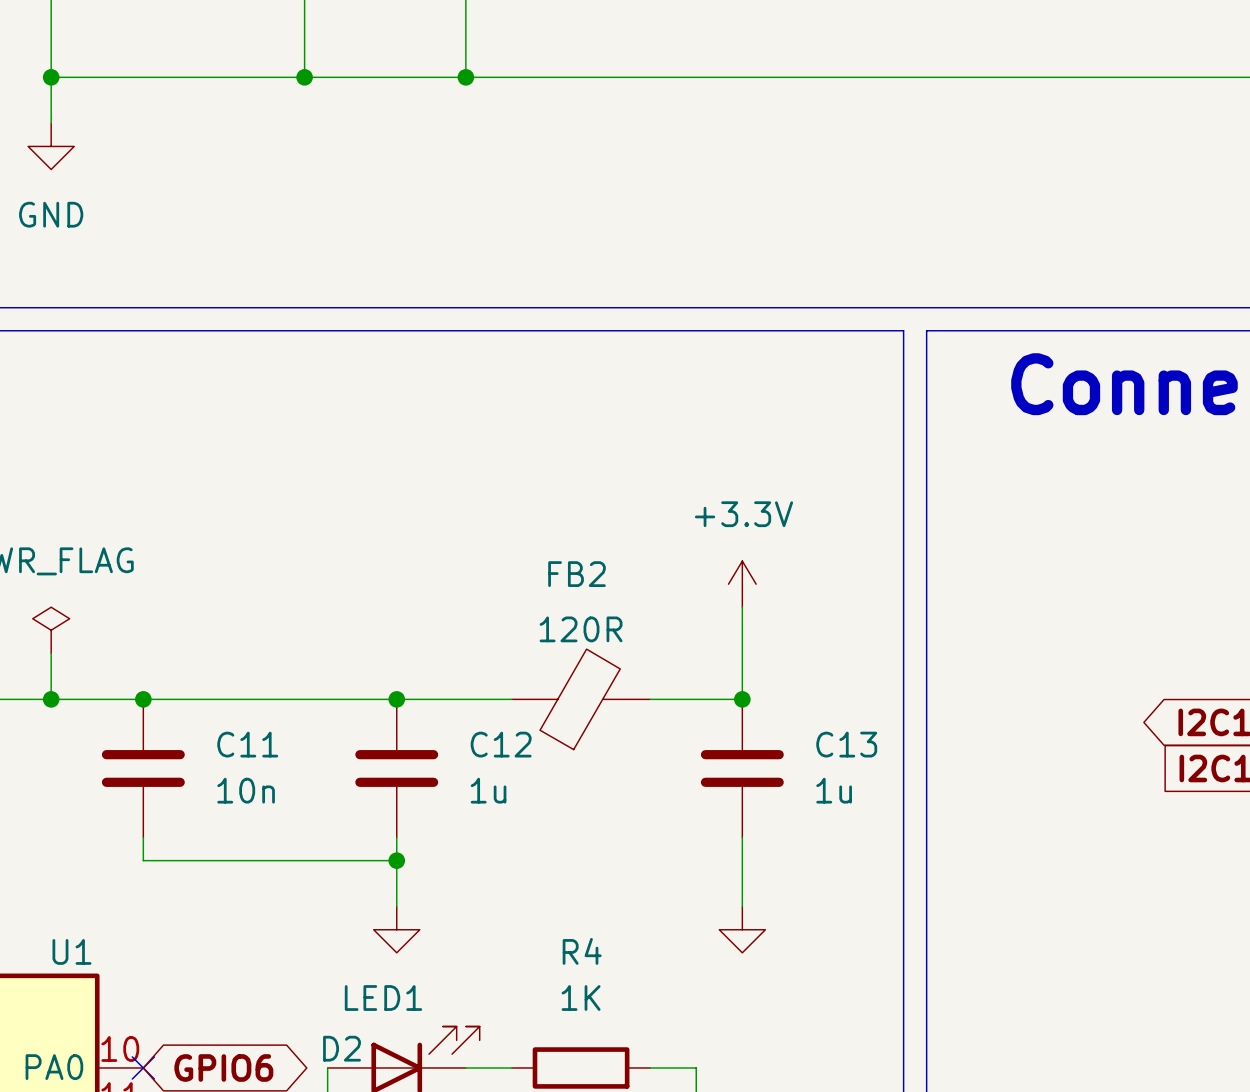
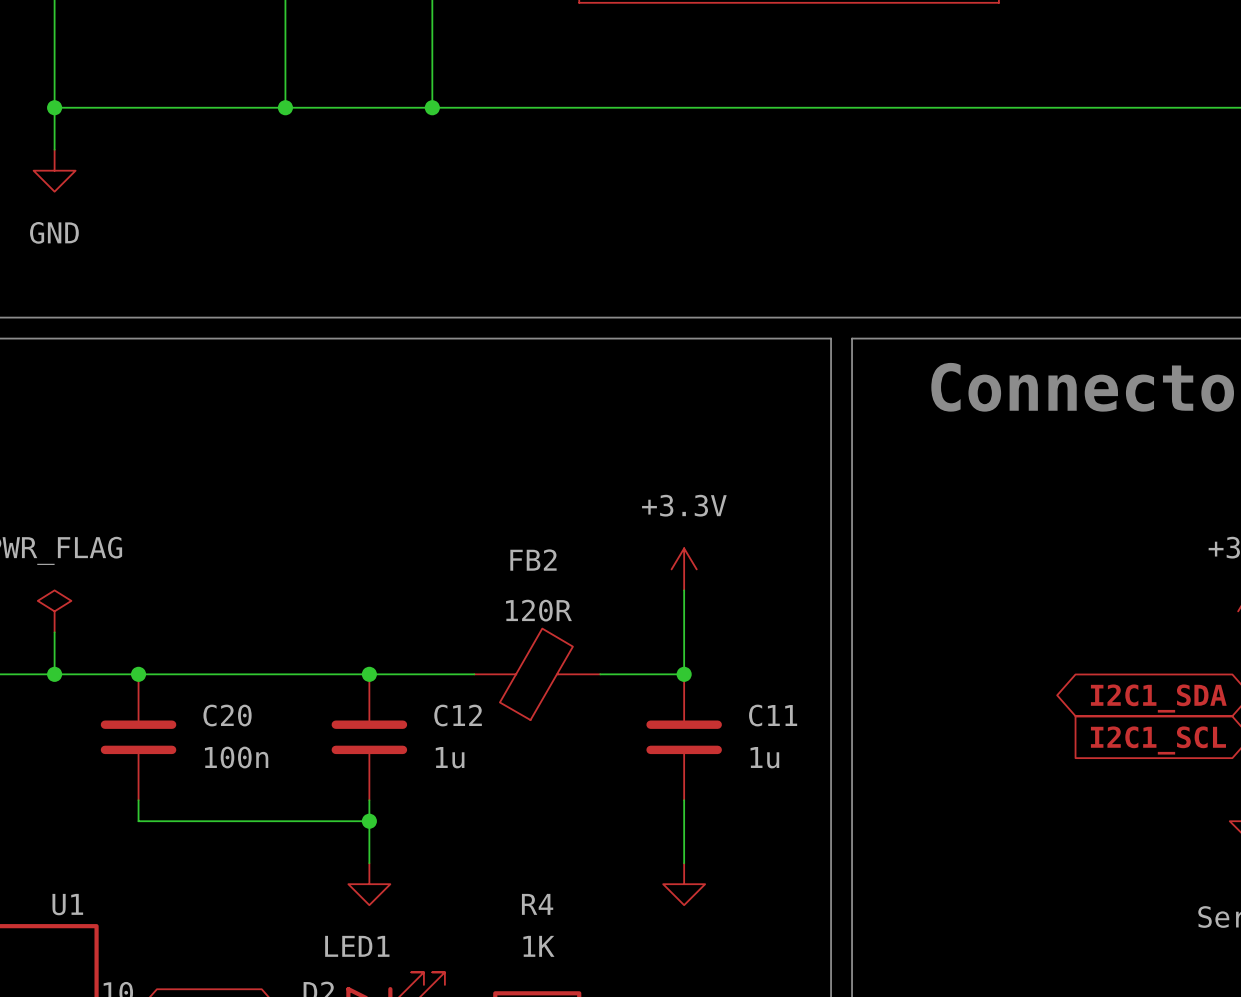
C11 name: C11 (247, 744) -> C20 (227, 715)
C13 name: C13 (846, 744) -> C11 (773, 715)
C11 value: 10n (246, 790) -> 100n (236, 757)

